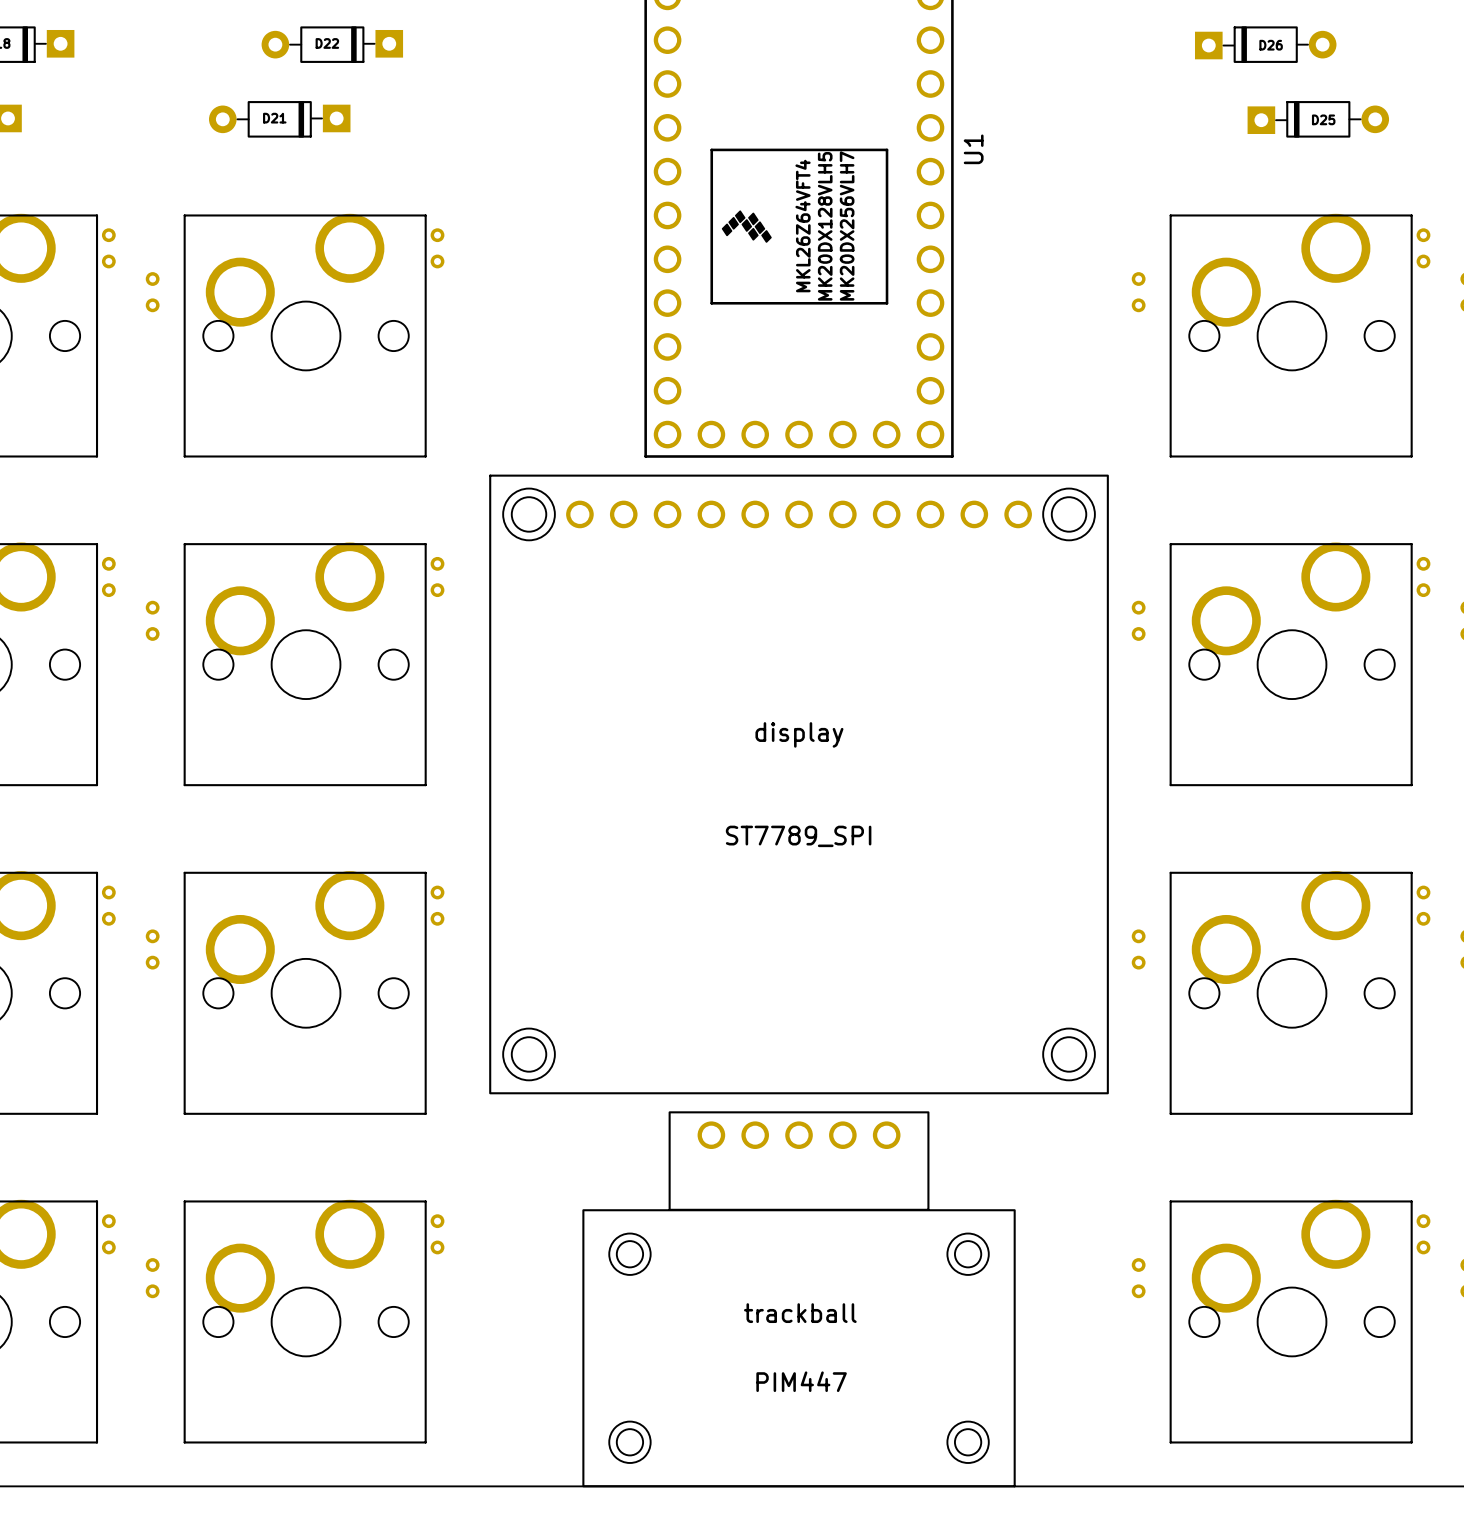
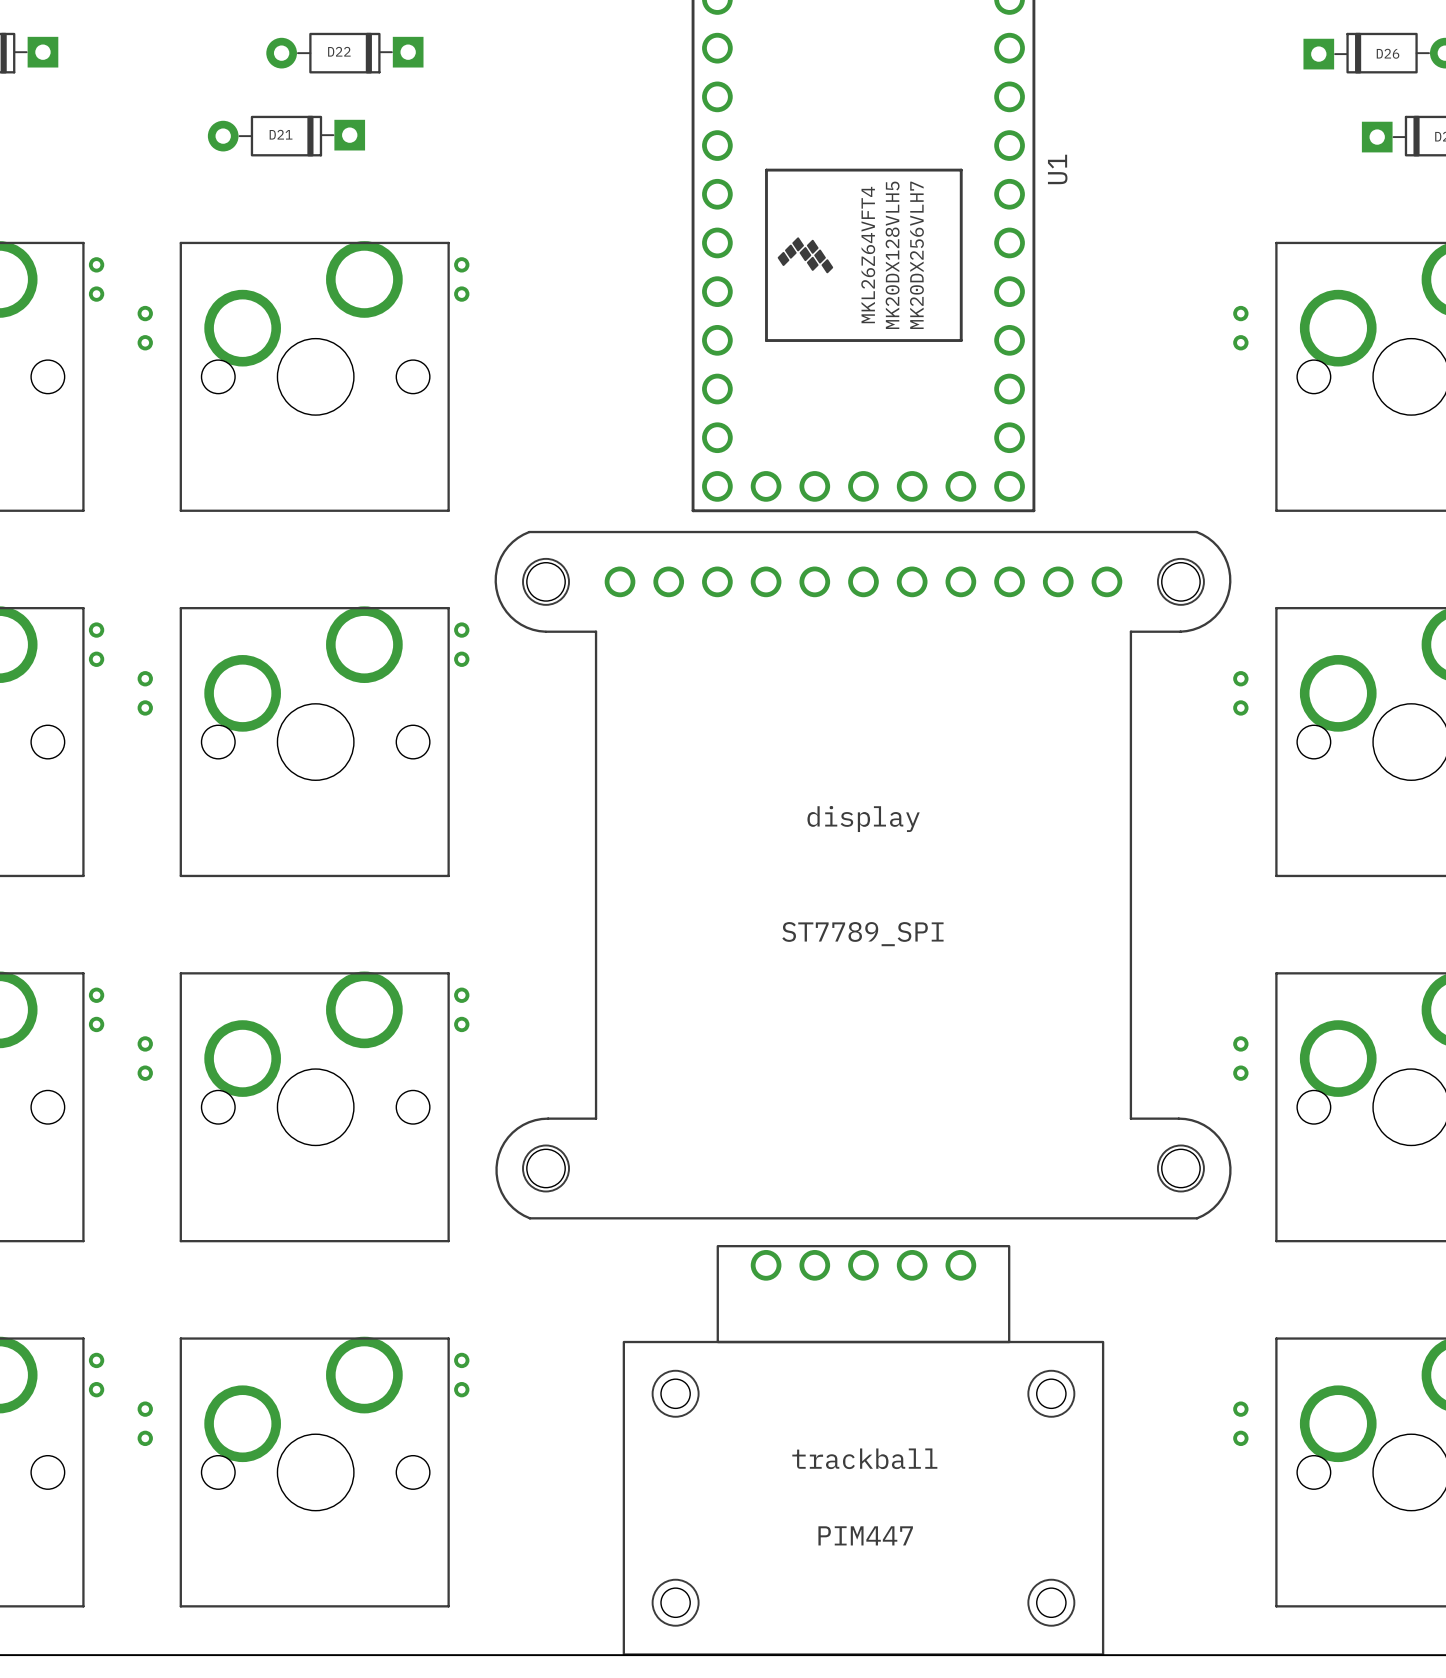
part footprint: [489, 474, 1109, 1095] -> [494, 530, 1232, 1220]
part footprint: [582, 1111, 1016, 1488] -> [622, 1245, 1105, 1656]

